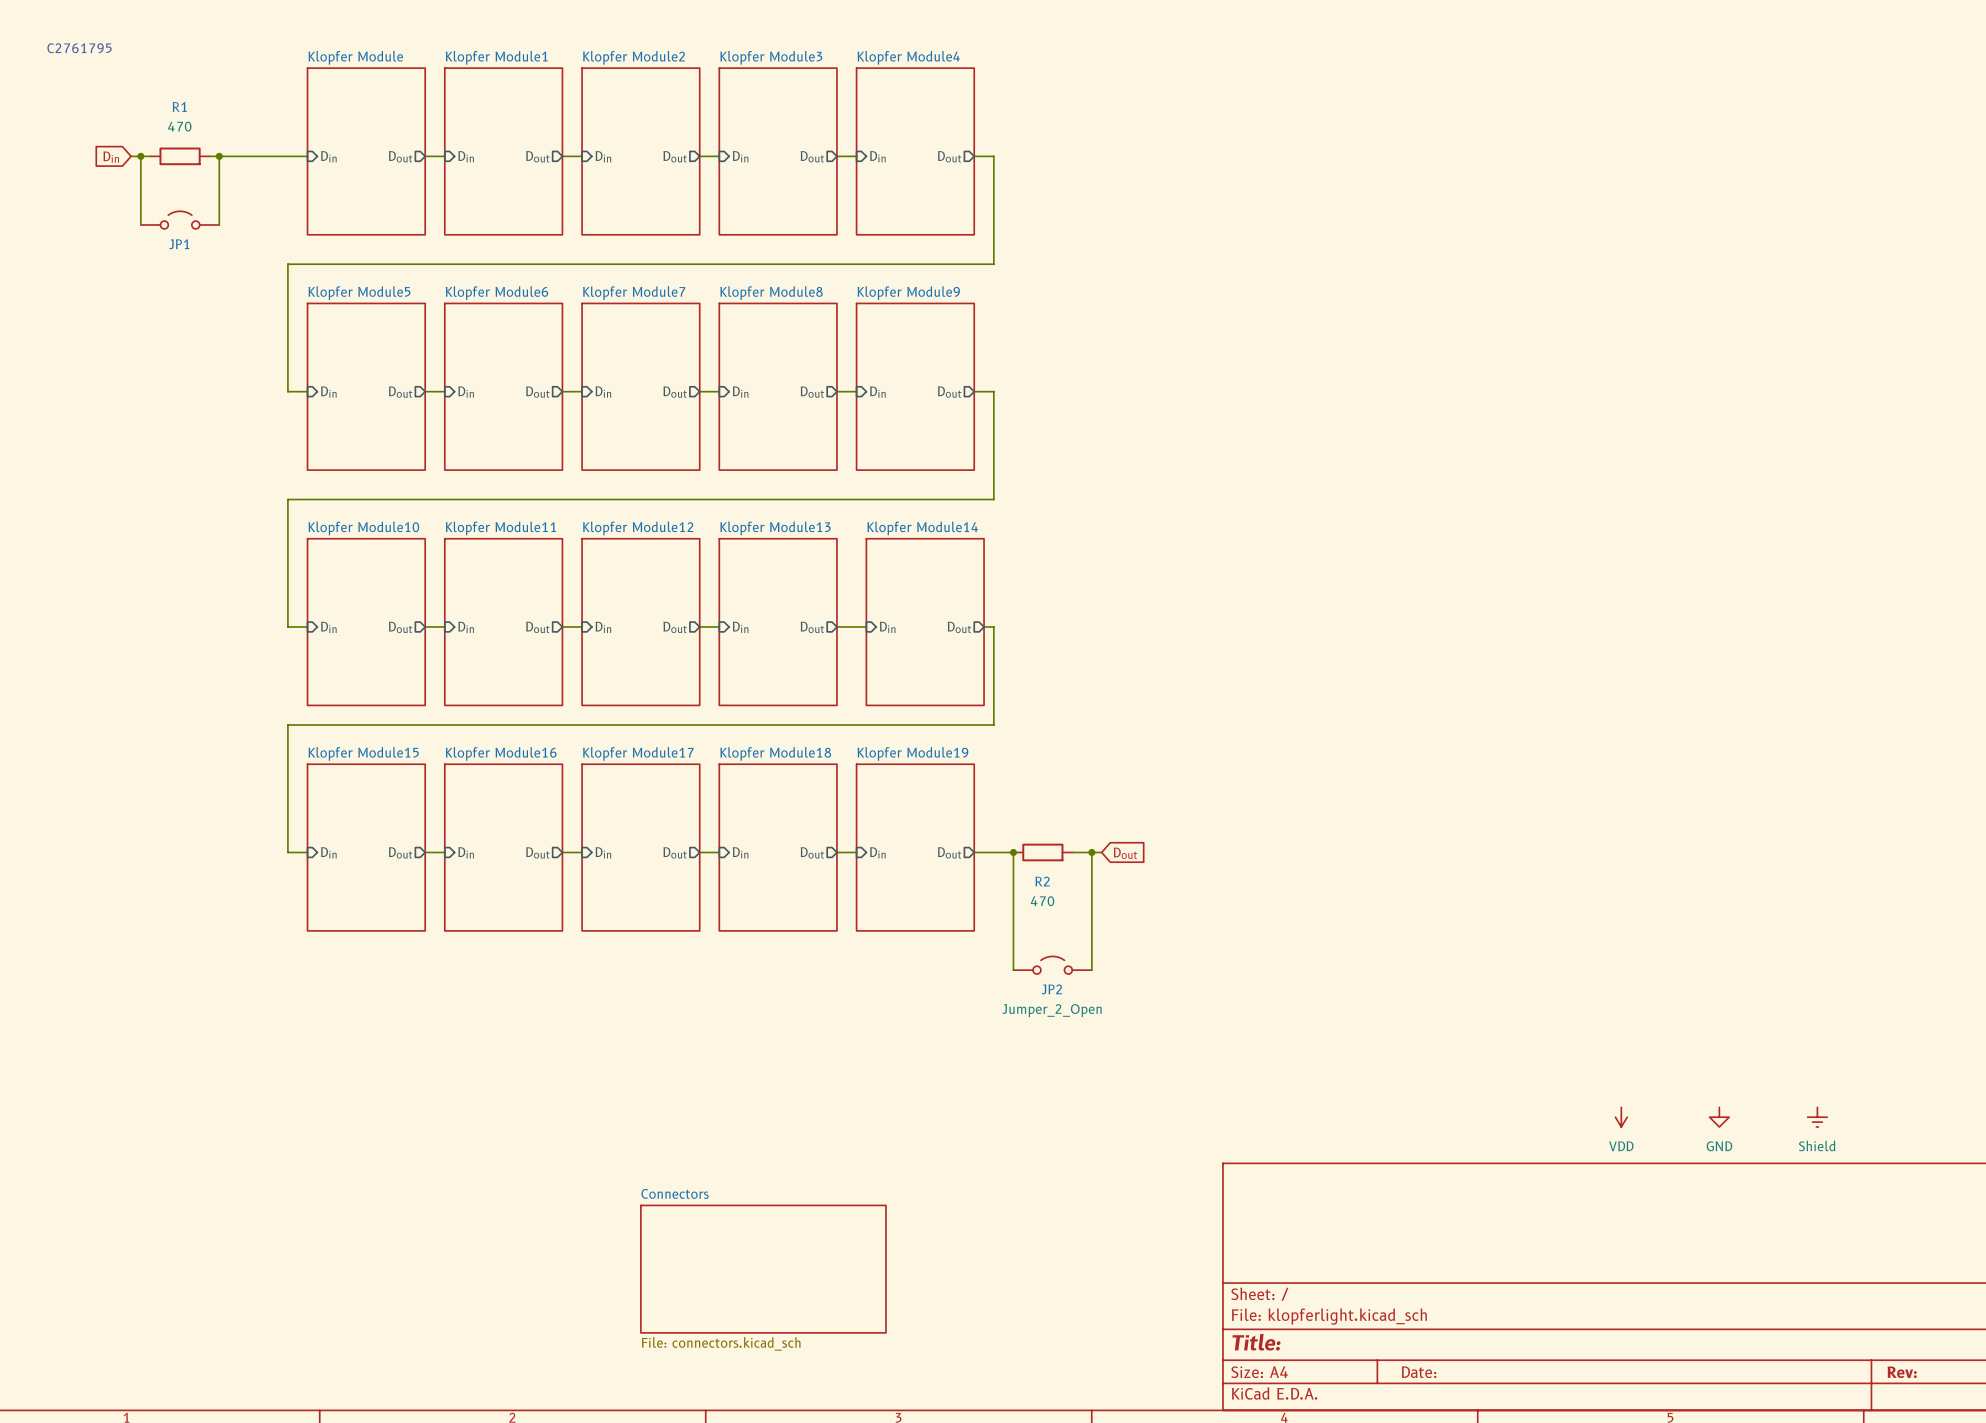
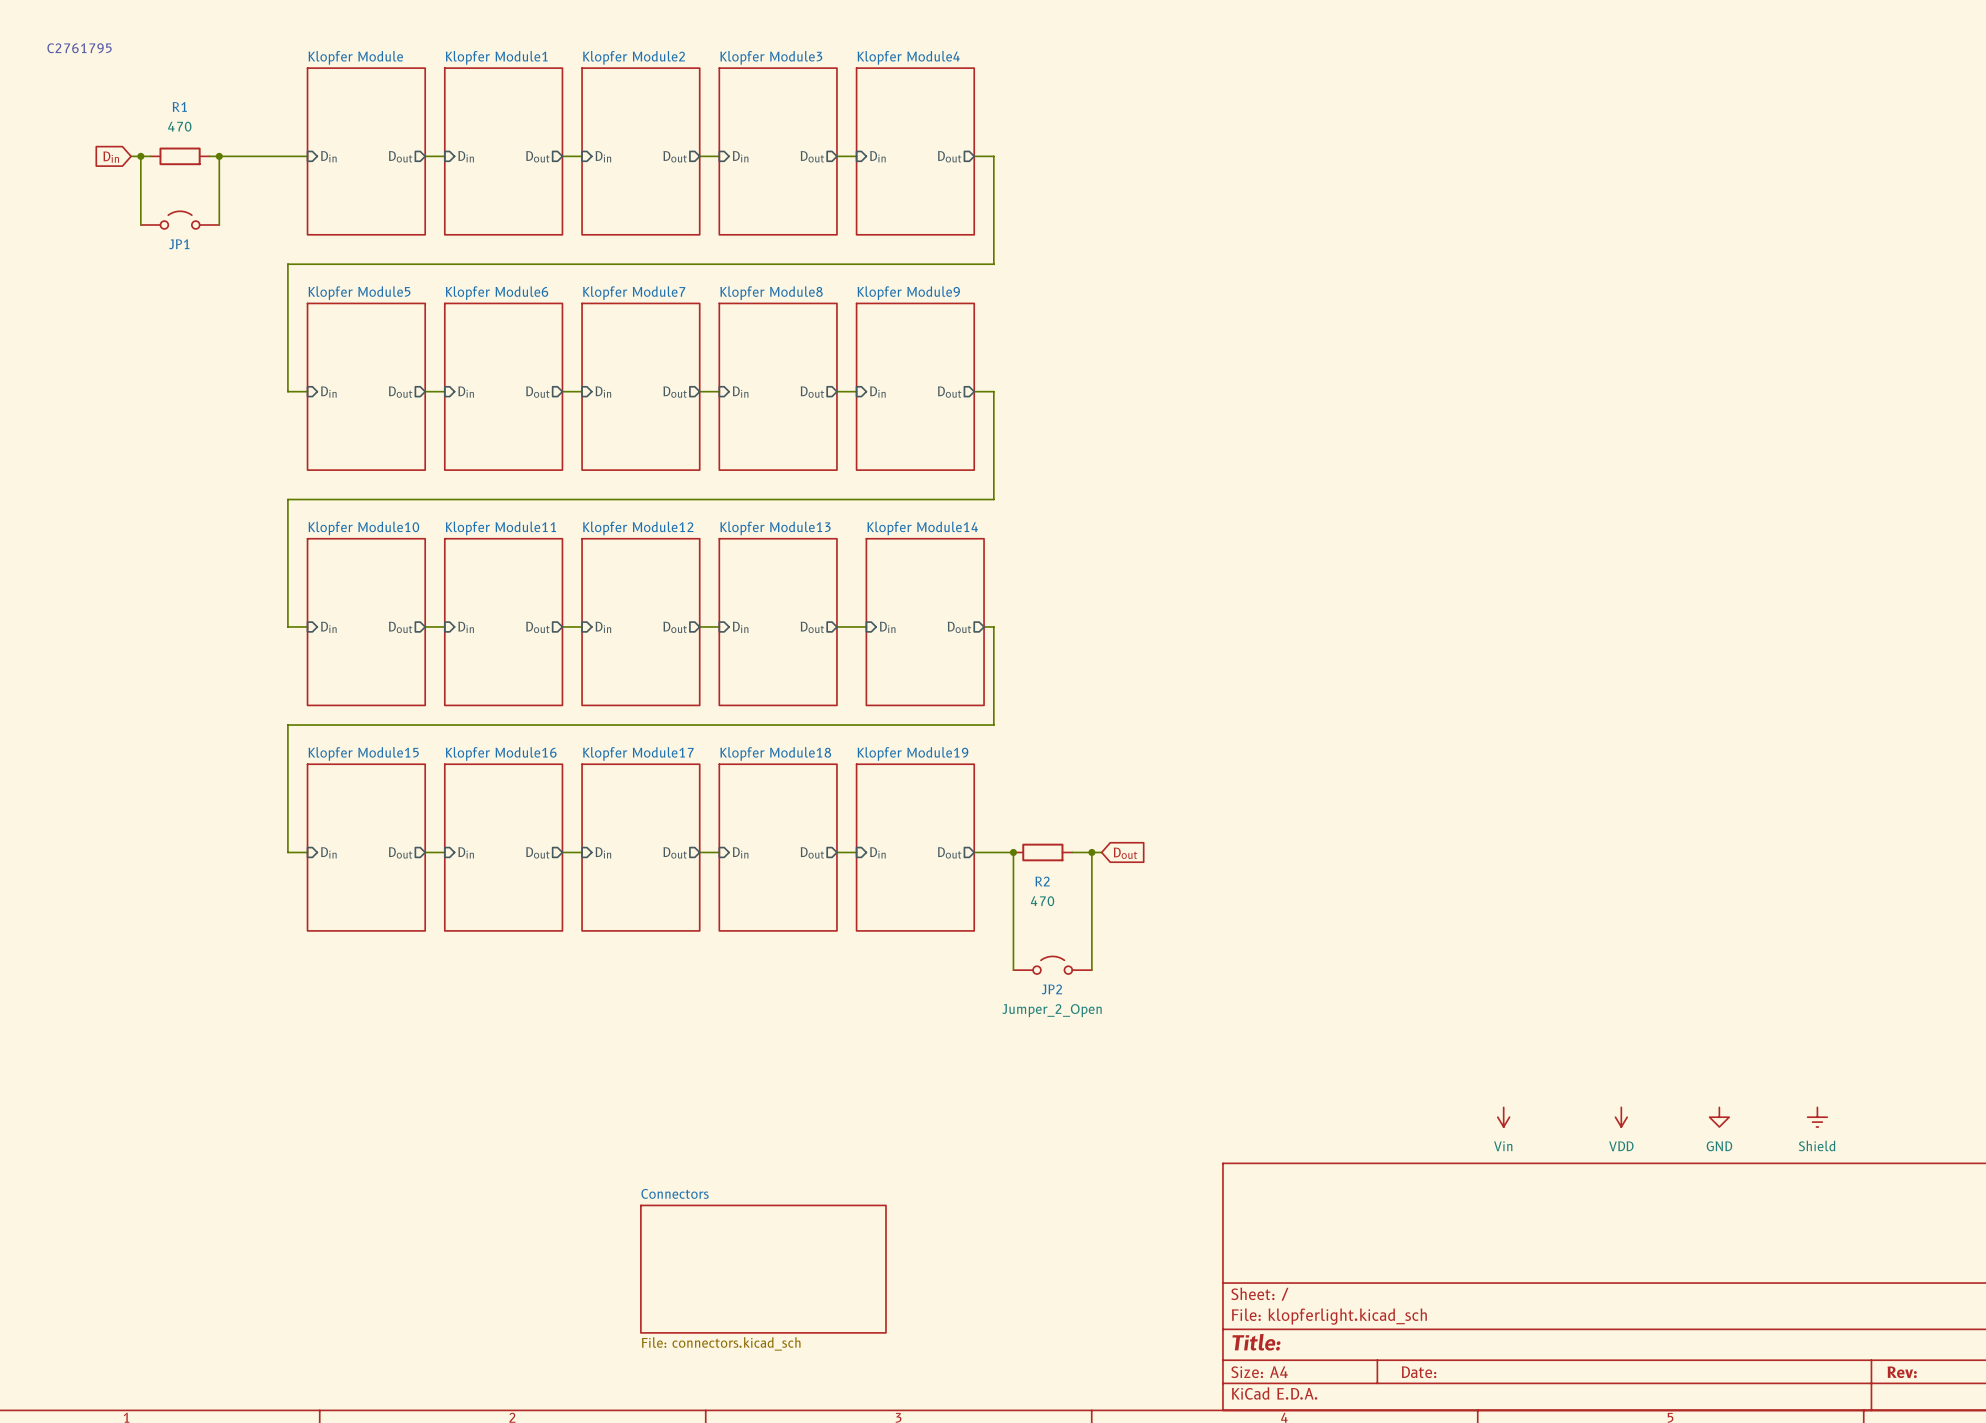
power symbol: none -> Vin (1503, 1117)

